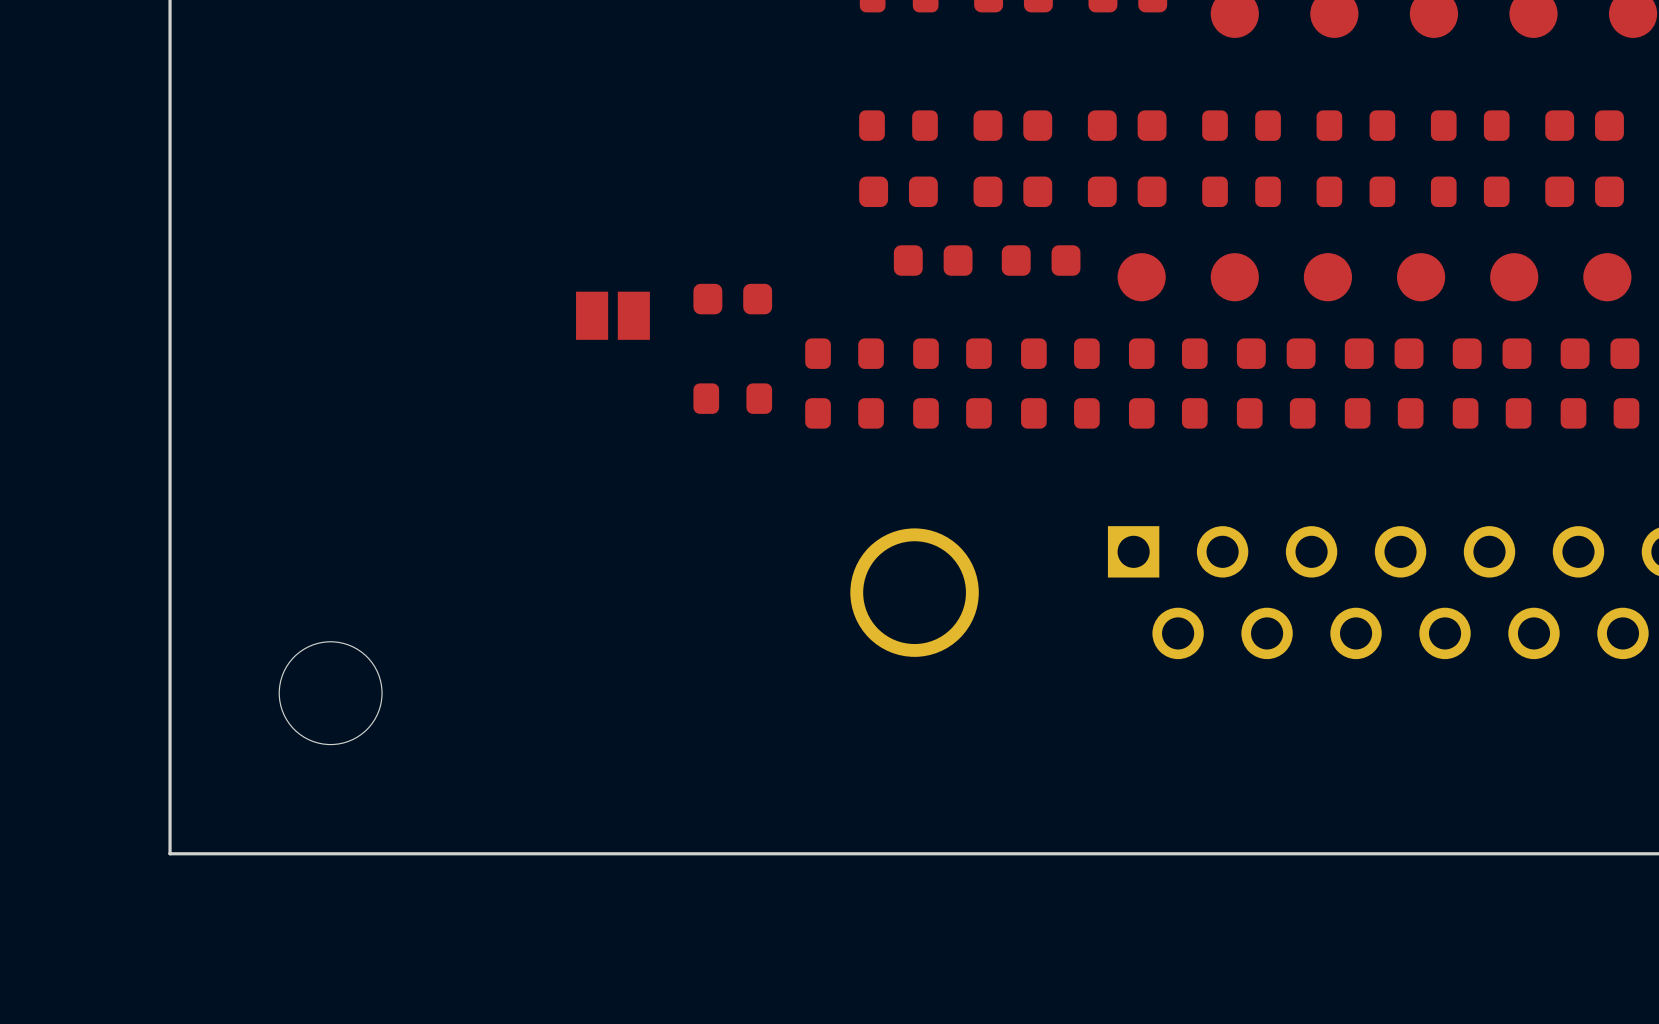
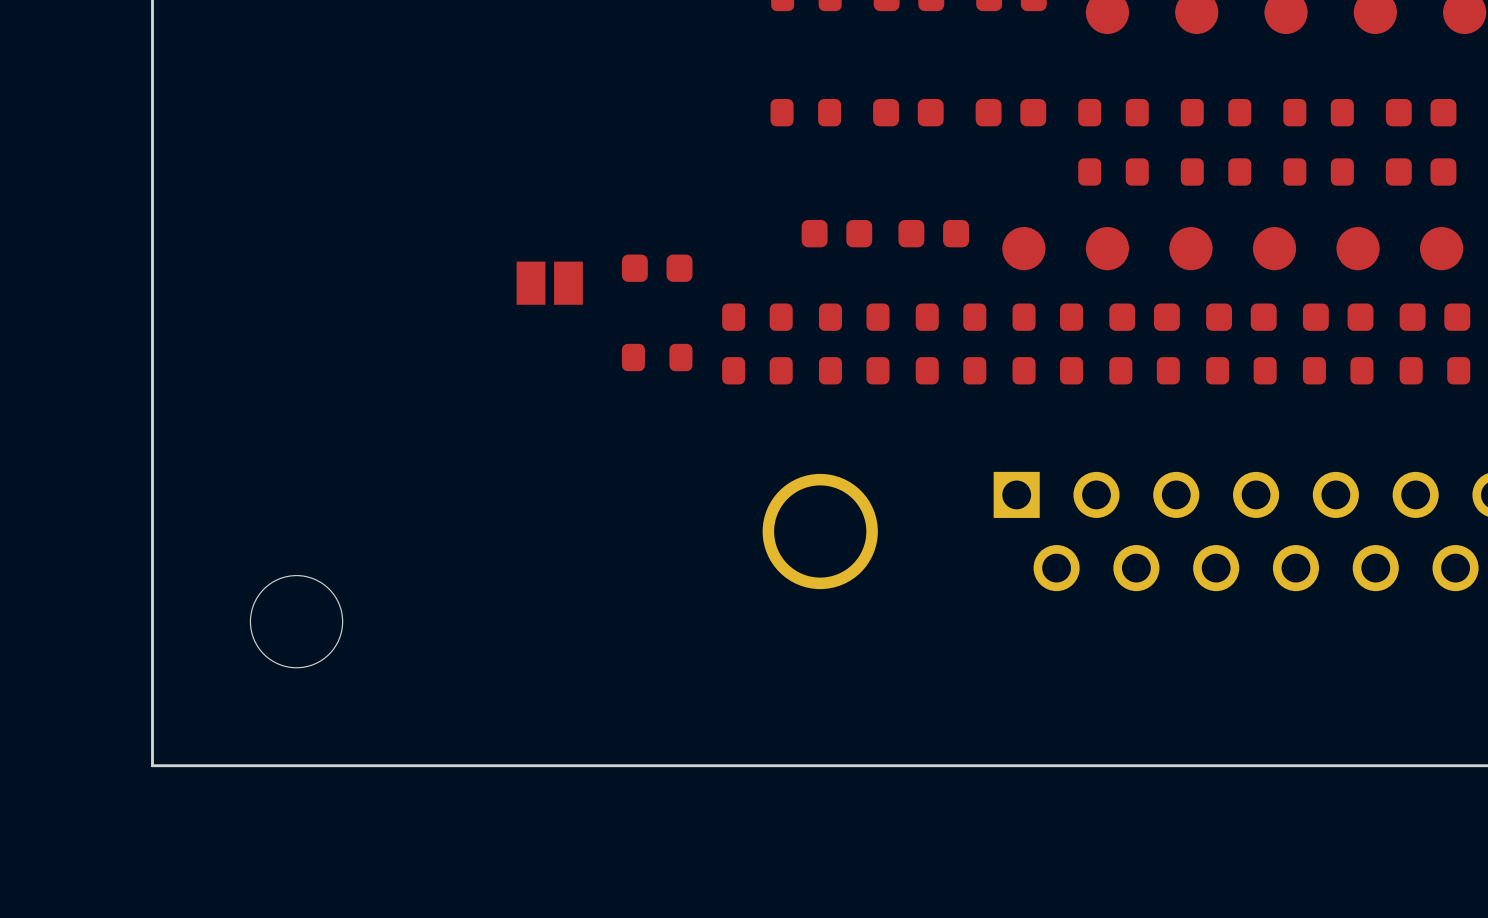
part: (898, 191) -> none
part: (1012, 191) -> none
part: (1127, 191) -> none

